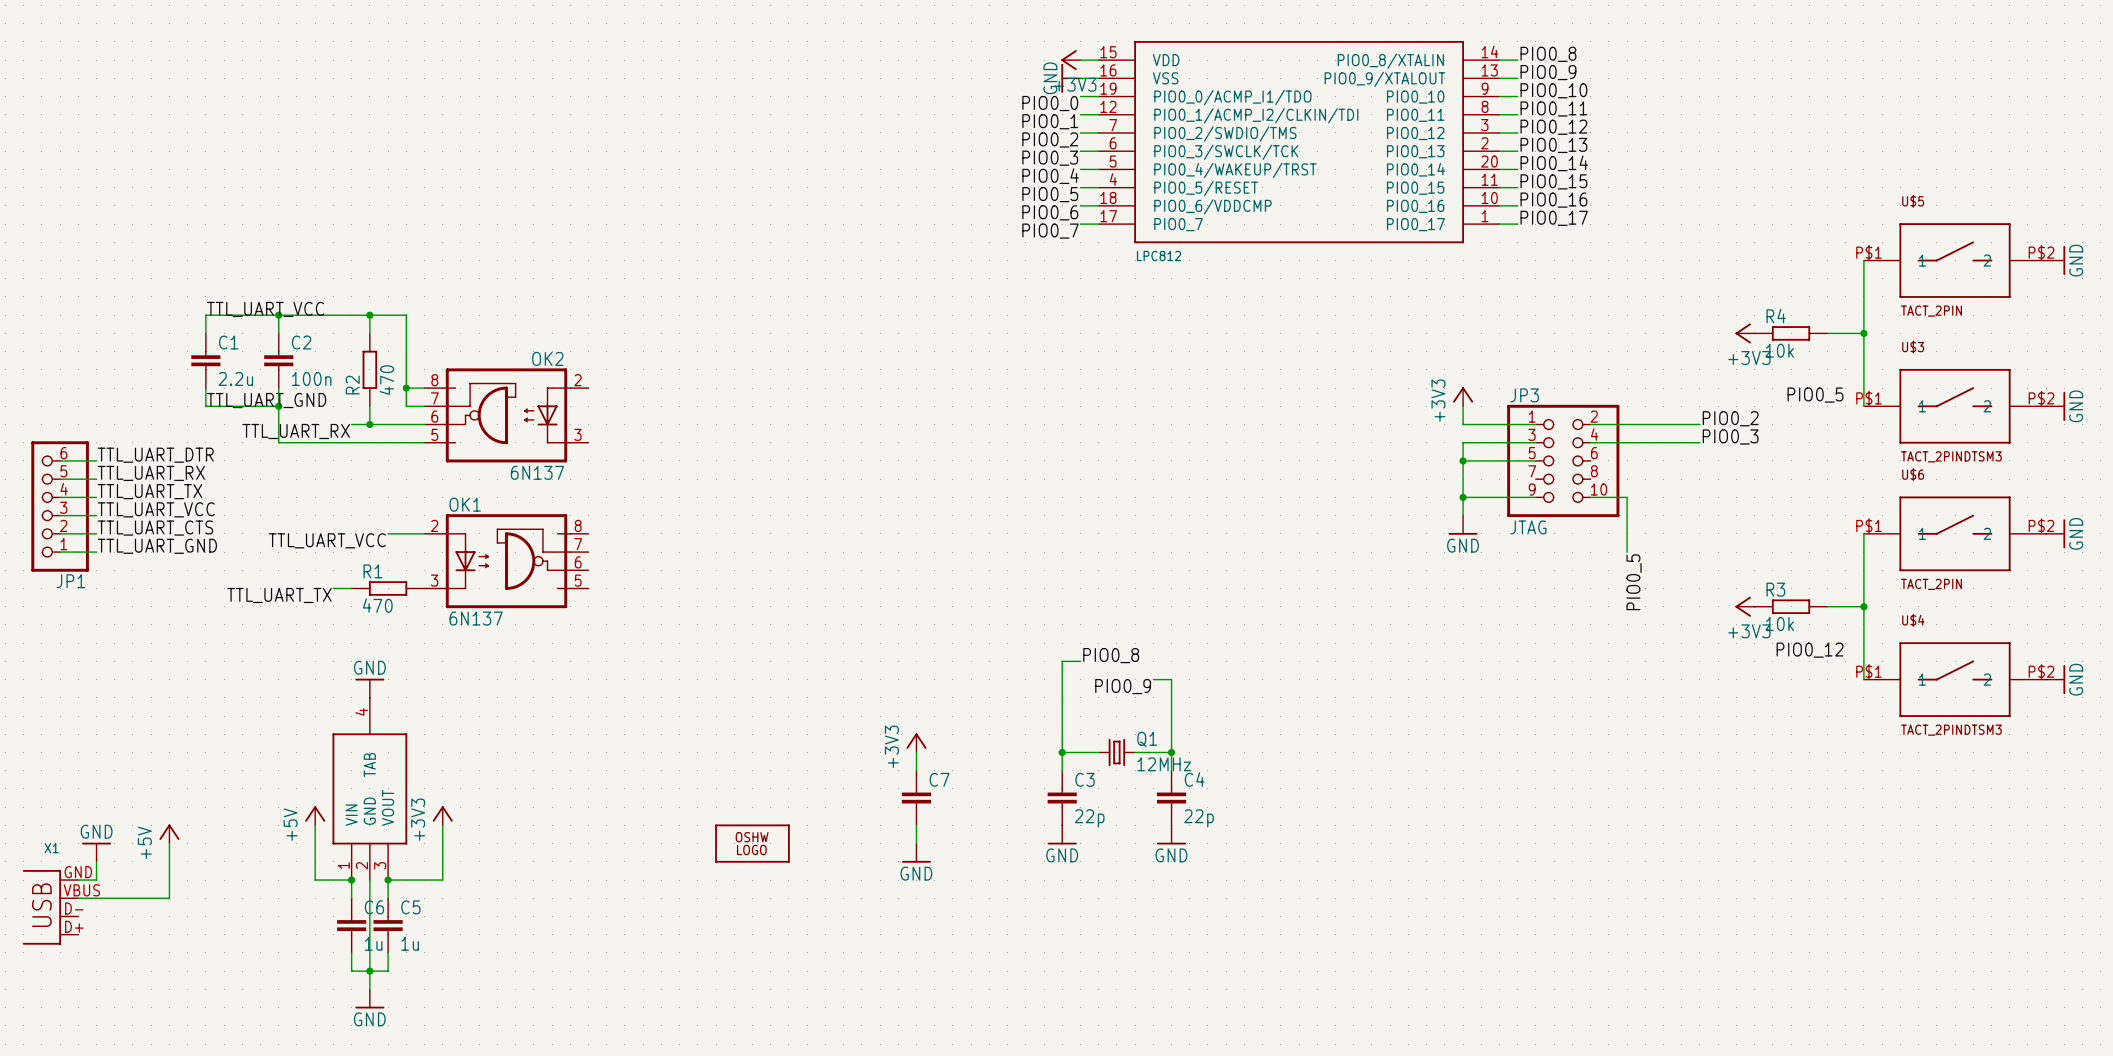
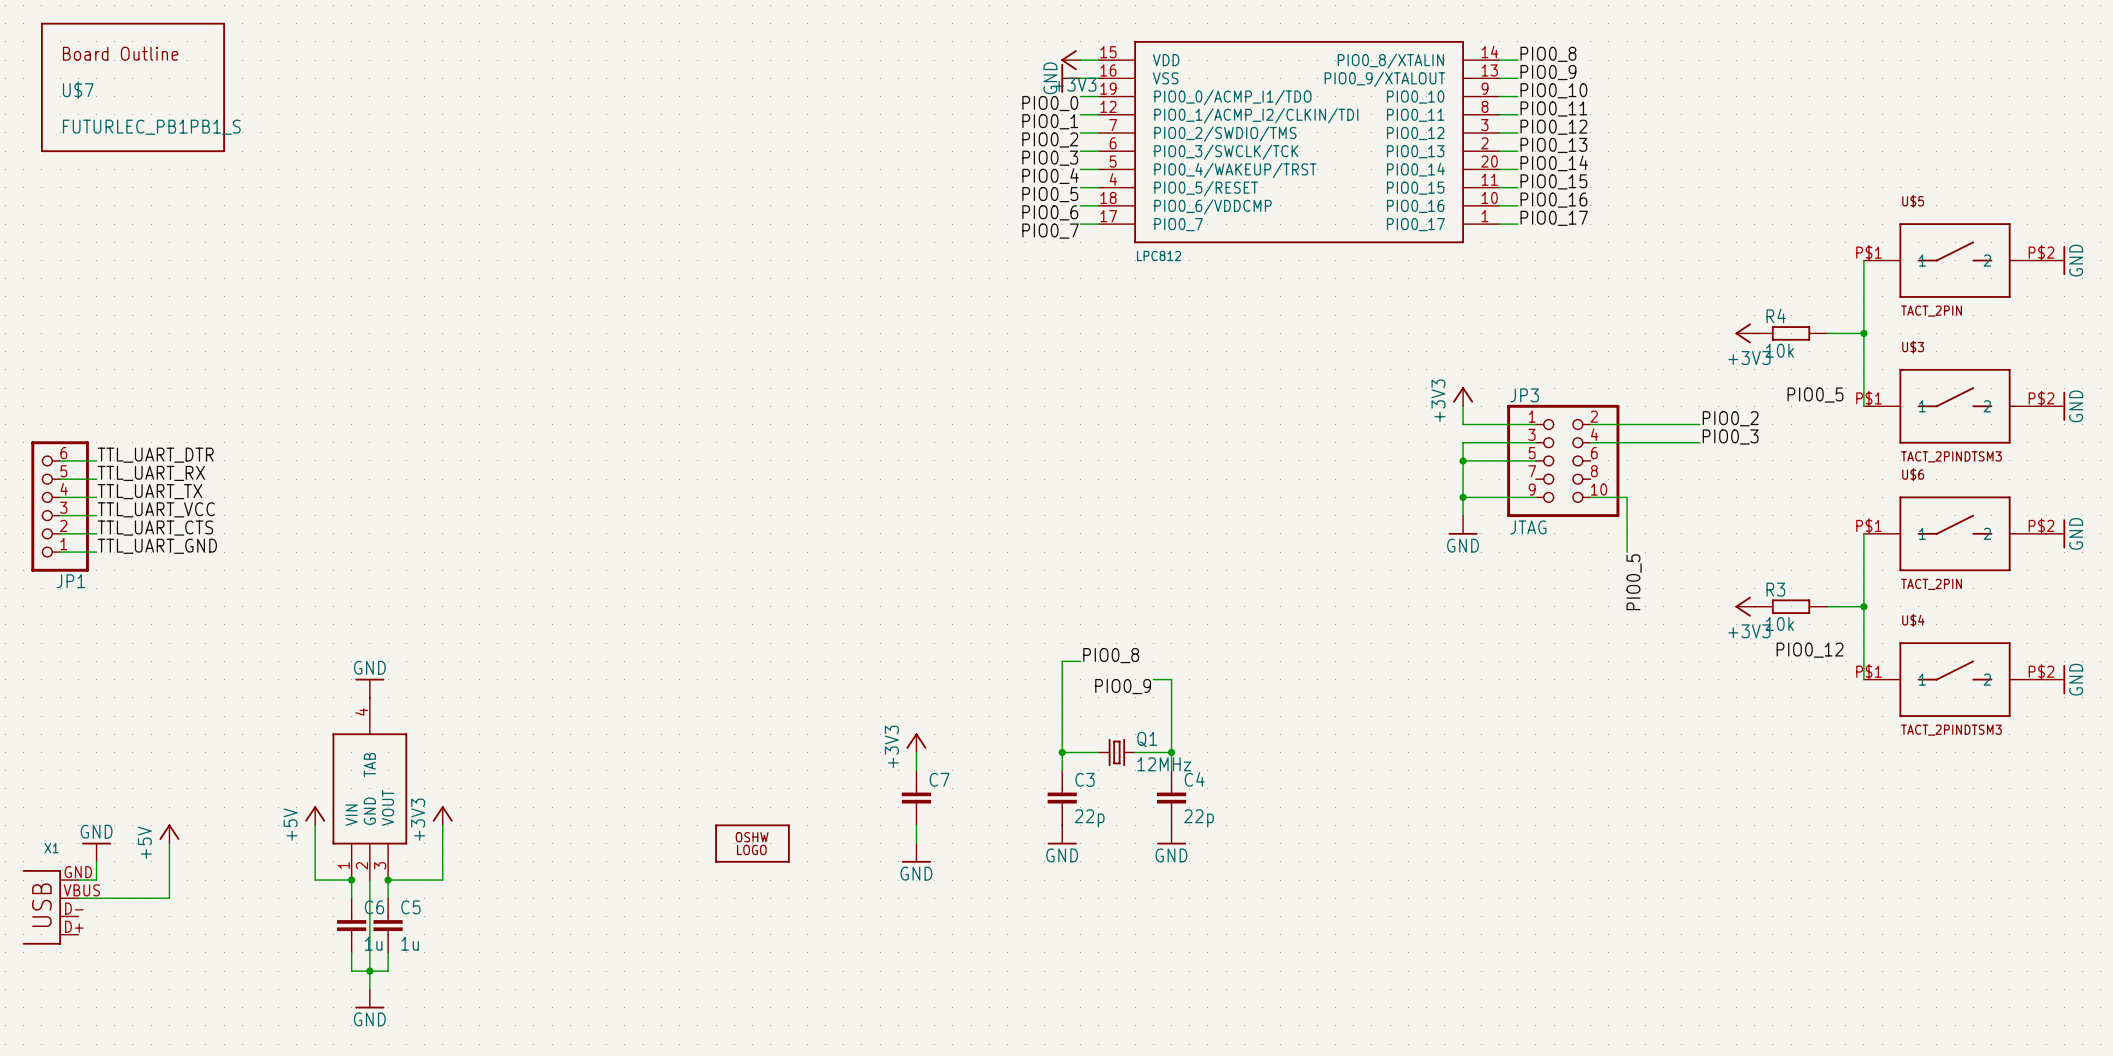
U$7: none -> FUTURLEC_PB1PB1_S (132, 87)
label: TTL_UART_VCC (265, 309) -> none
wire: (278, 315) (278, 333) -> none
junction: (278, 315) -> none
wire: (369, 315) (369, 333) -> none
junction: (369, 315) -> none
wire: (205, 333) (205, 315) (406, 315) (406, 406) (424, 406) -> none
C1: 2.2u (205, 360) -> none
C2: 100n (278, 360) -> none
R2: 470 (369, 369) -> none
wire: (205, 388) (205, 406) (278, 406) -> none
wire: (278, 388) (278, 442) (424, 442) -> none
wire: (406, 388) (424, 388) -> none
junction: (406, 388) -> none
label: TTL_UART_GND (266, 400) -> none
junction: (278, 406) -> none
wire: (369, 406) (369, 424) -> none
OK2: 6N137 (506, 415) -> none
wire: (351, 424) (424, 424) -> none
junction: (369, 424) -> none
label: TTL_UART_RX (296, 431) -> none
wire: (388, 533) (424, 533) -> none
label: TTL_UART_VCC (327, 540) -> none
OK1: 6N137 (506, 561) -> none
wire: (333, 588) (351, 588) -> none
R1: 470 (388, 588) -> none
label: TTL_UART_TX (279, 595) -> none

